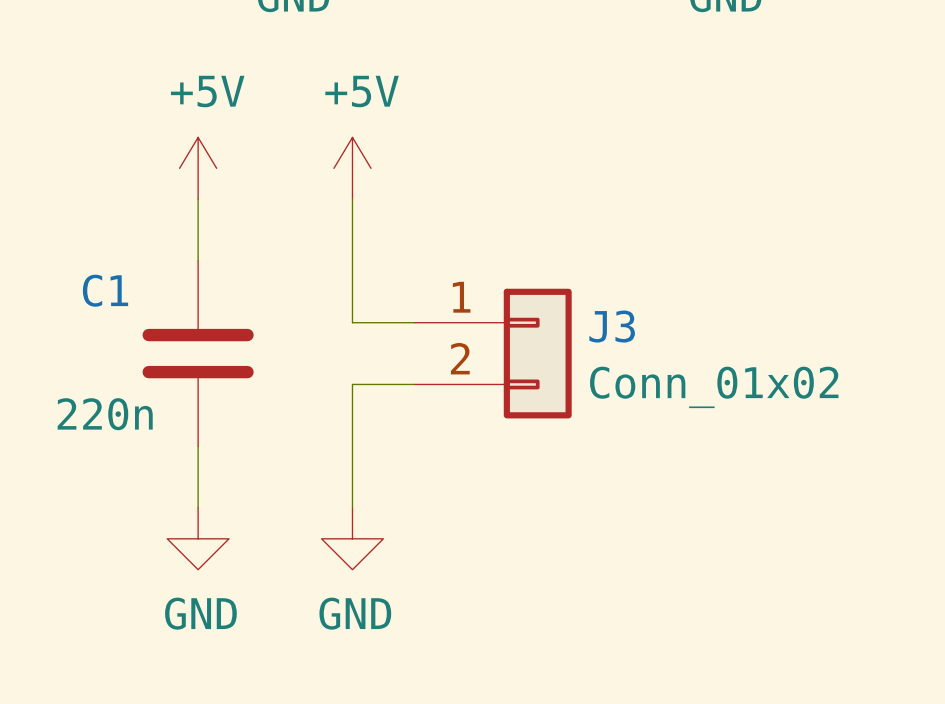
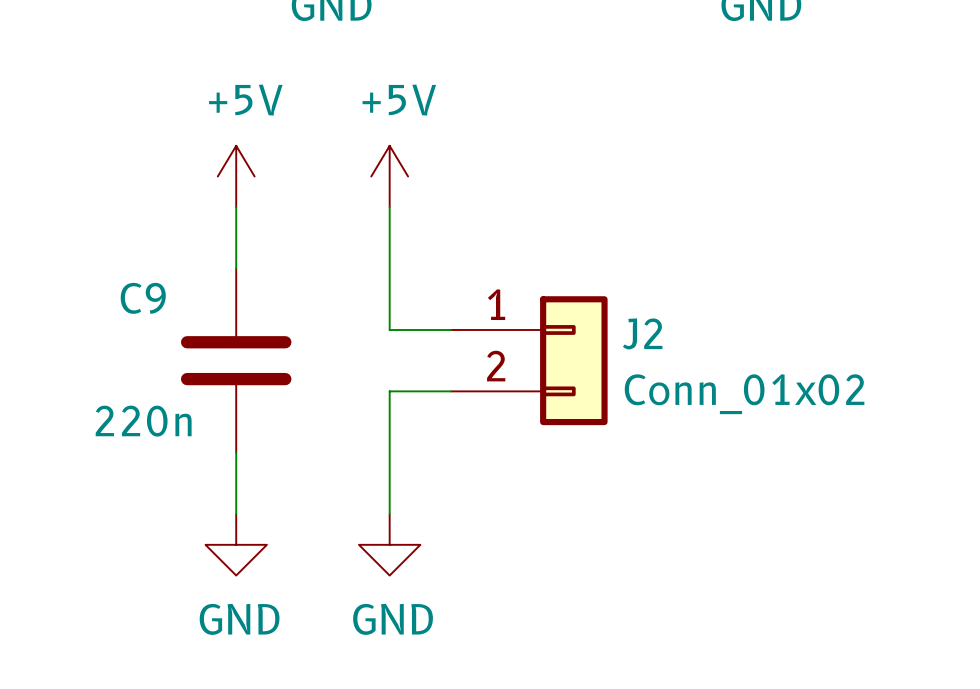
C1 name: C1 (105, 290) -> C9 (143, 298)
J3 name: J3 (612, 326) -> J2 (642, 333)

